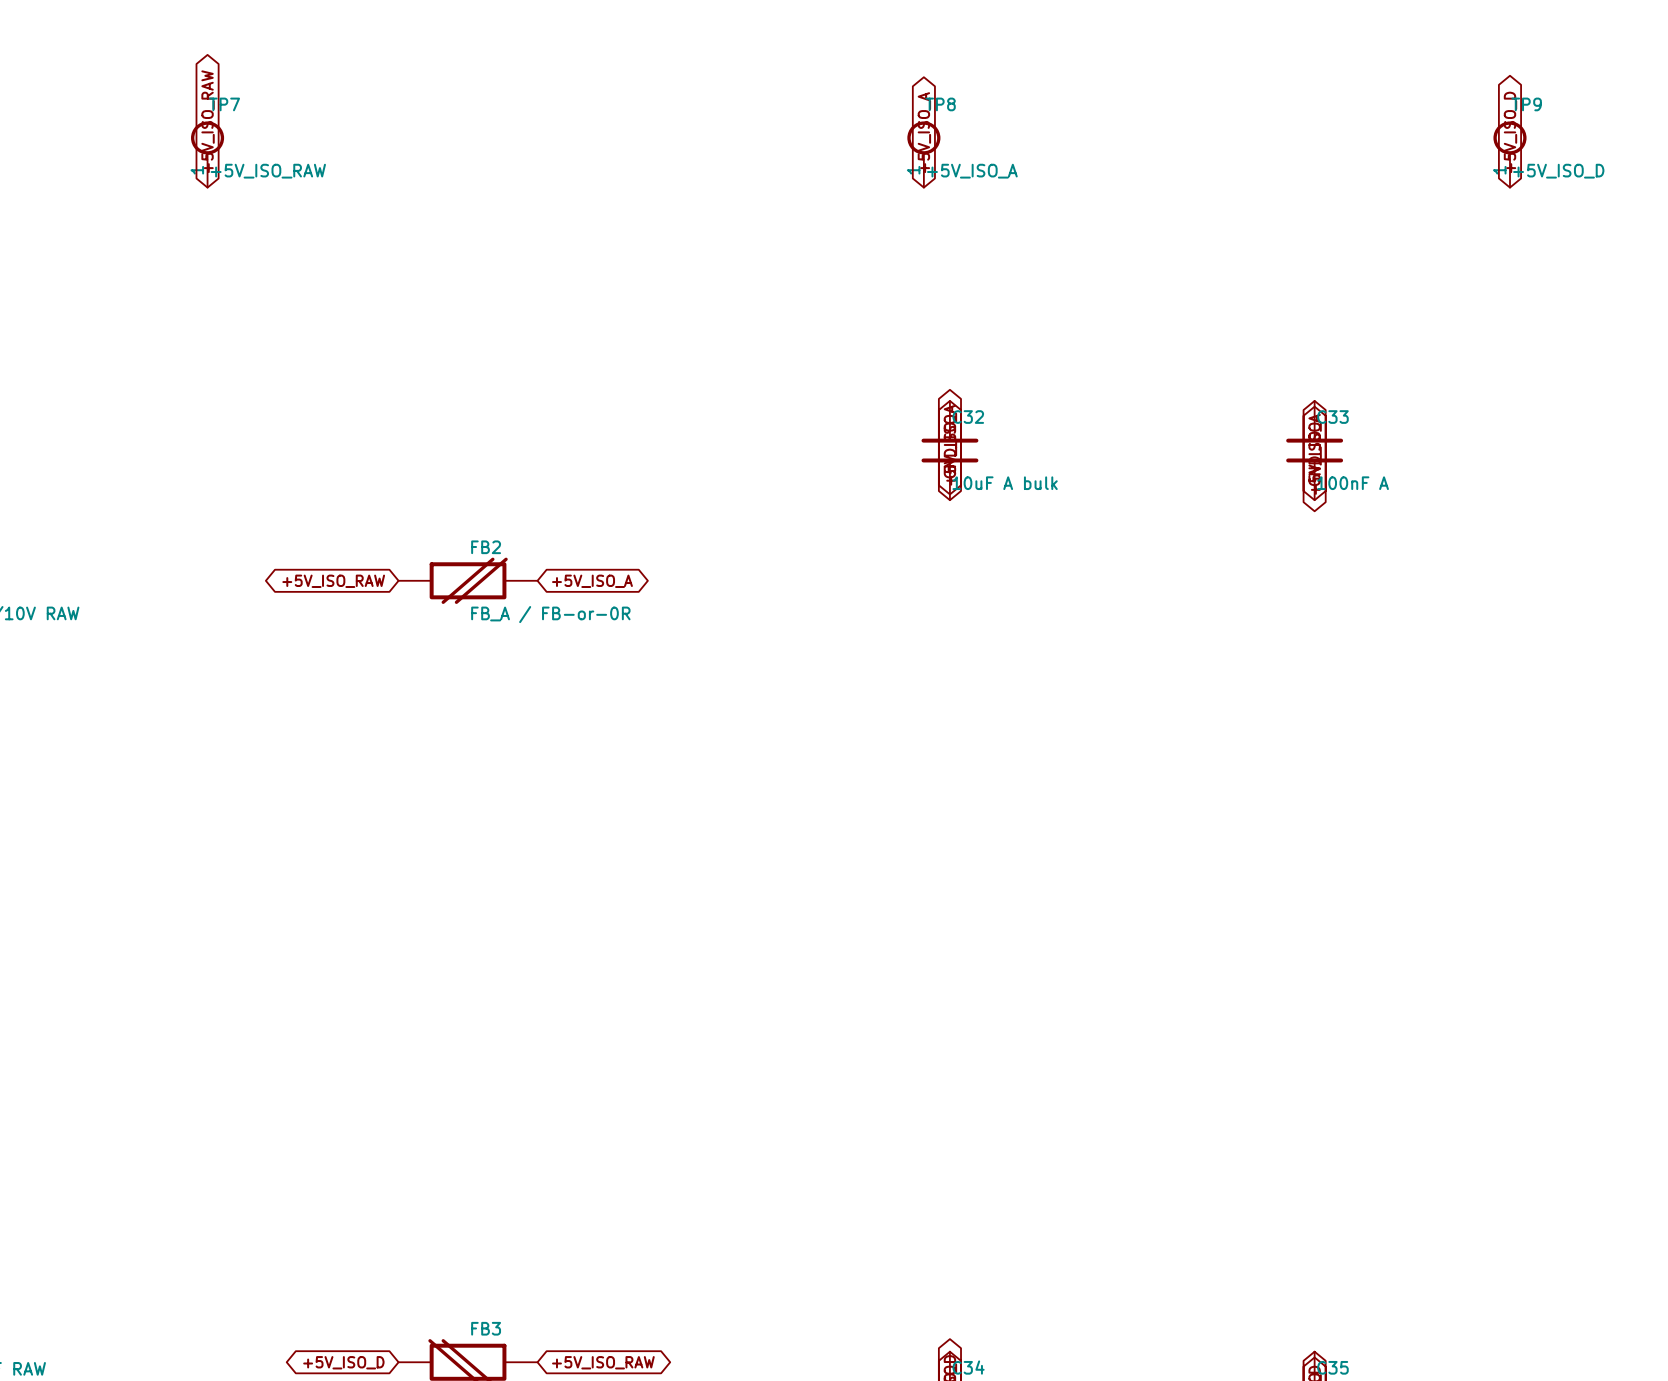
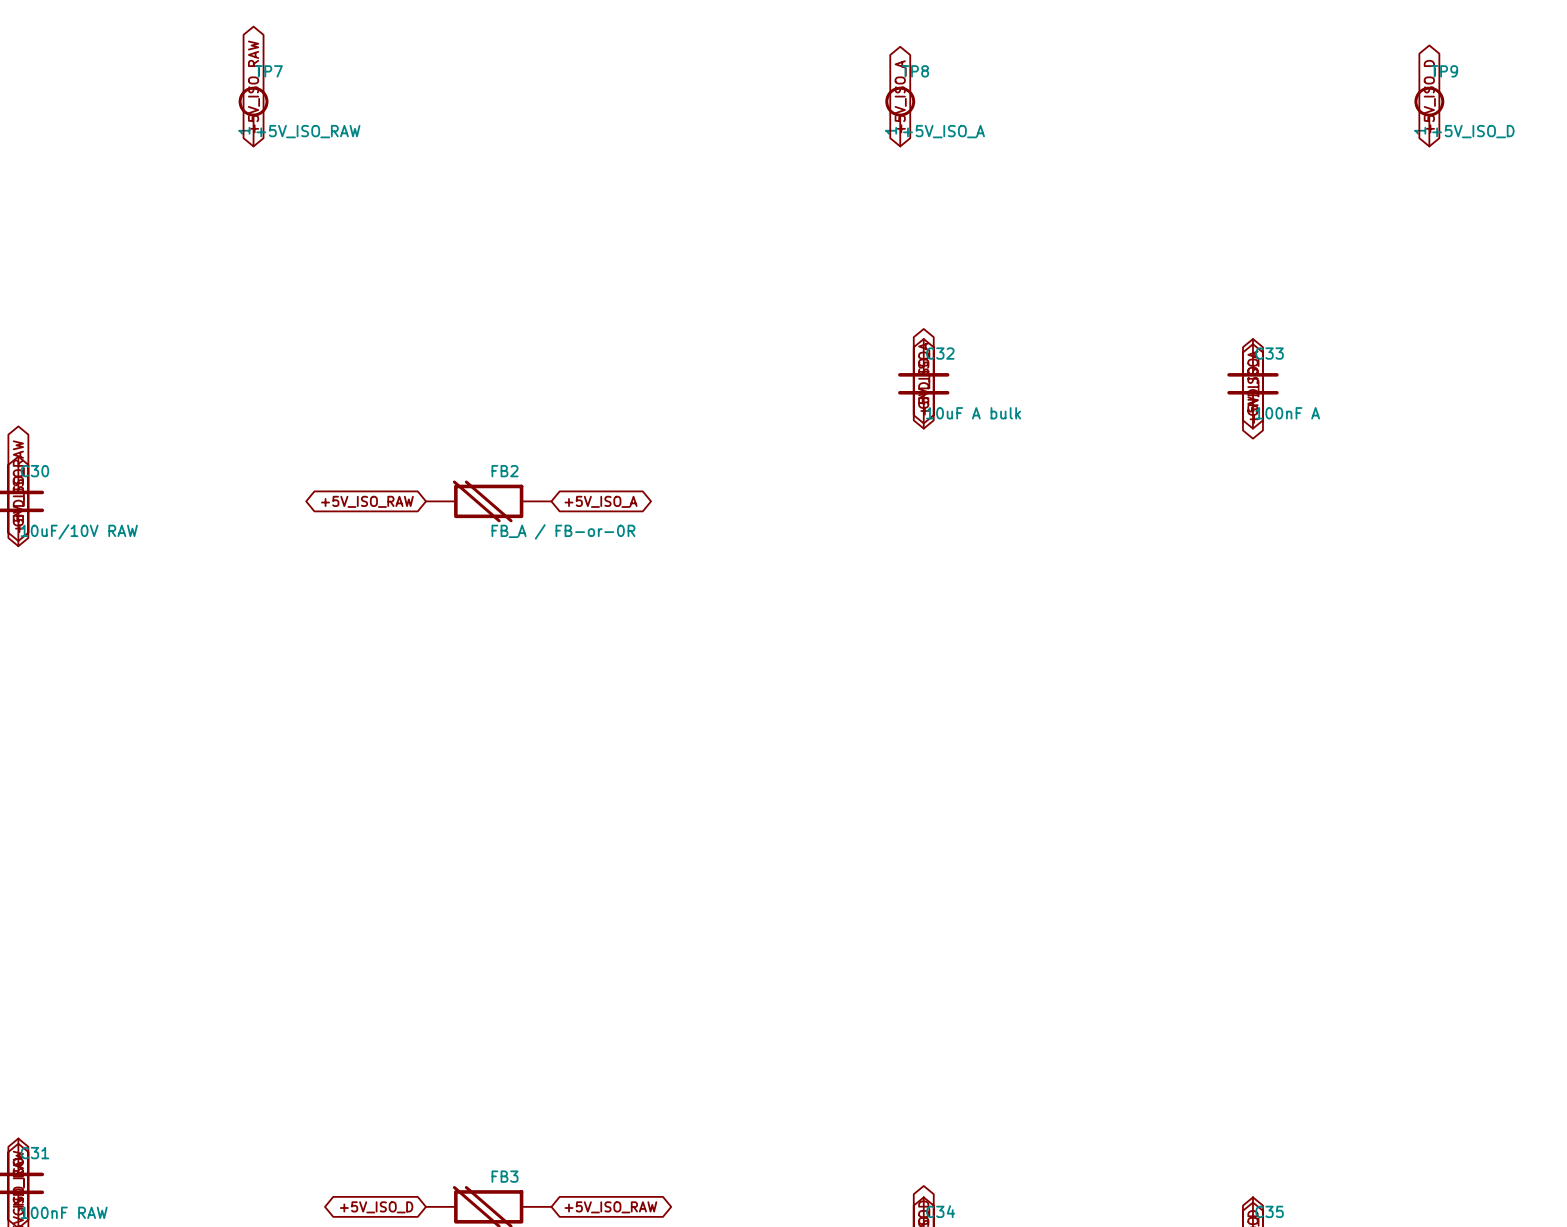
FB2 flip: as is (468, 580) -> left-right (488, 501)

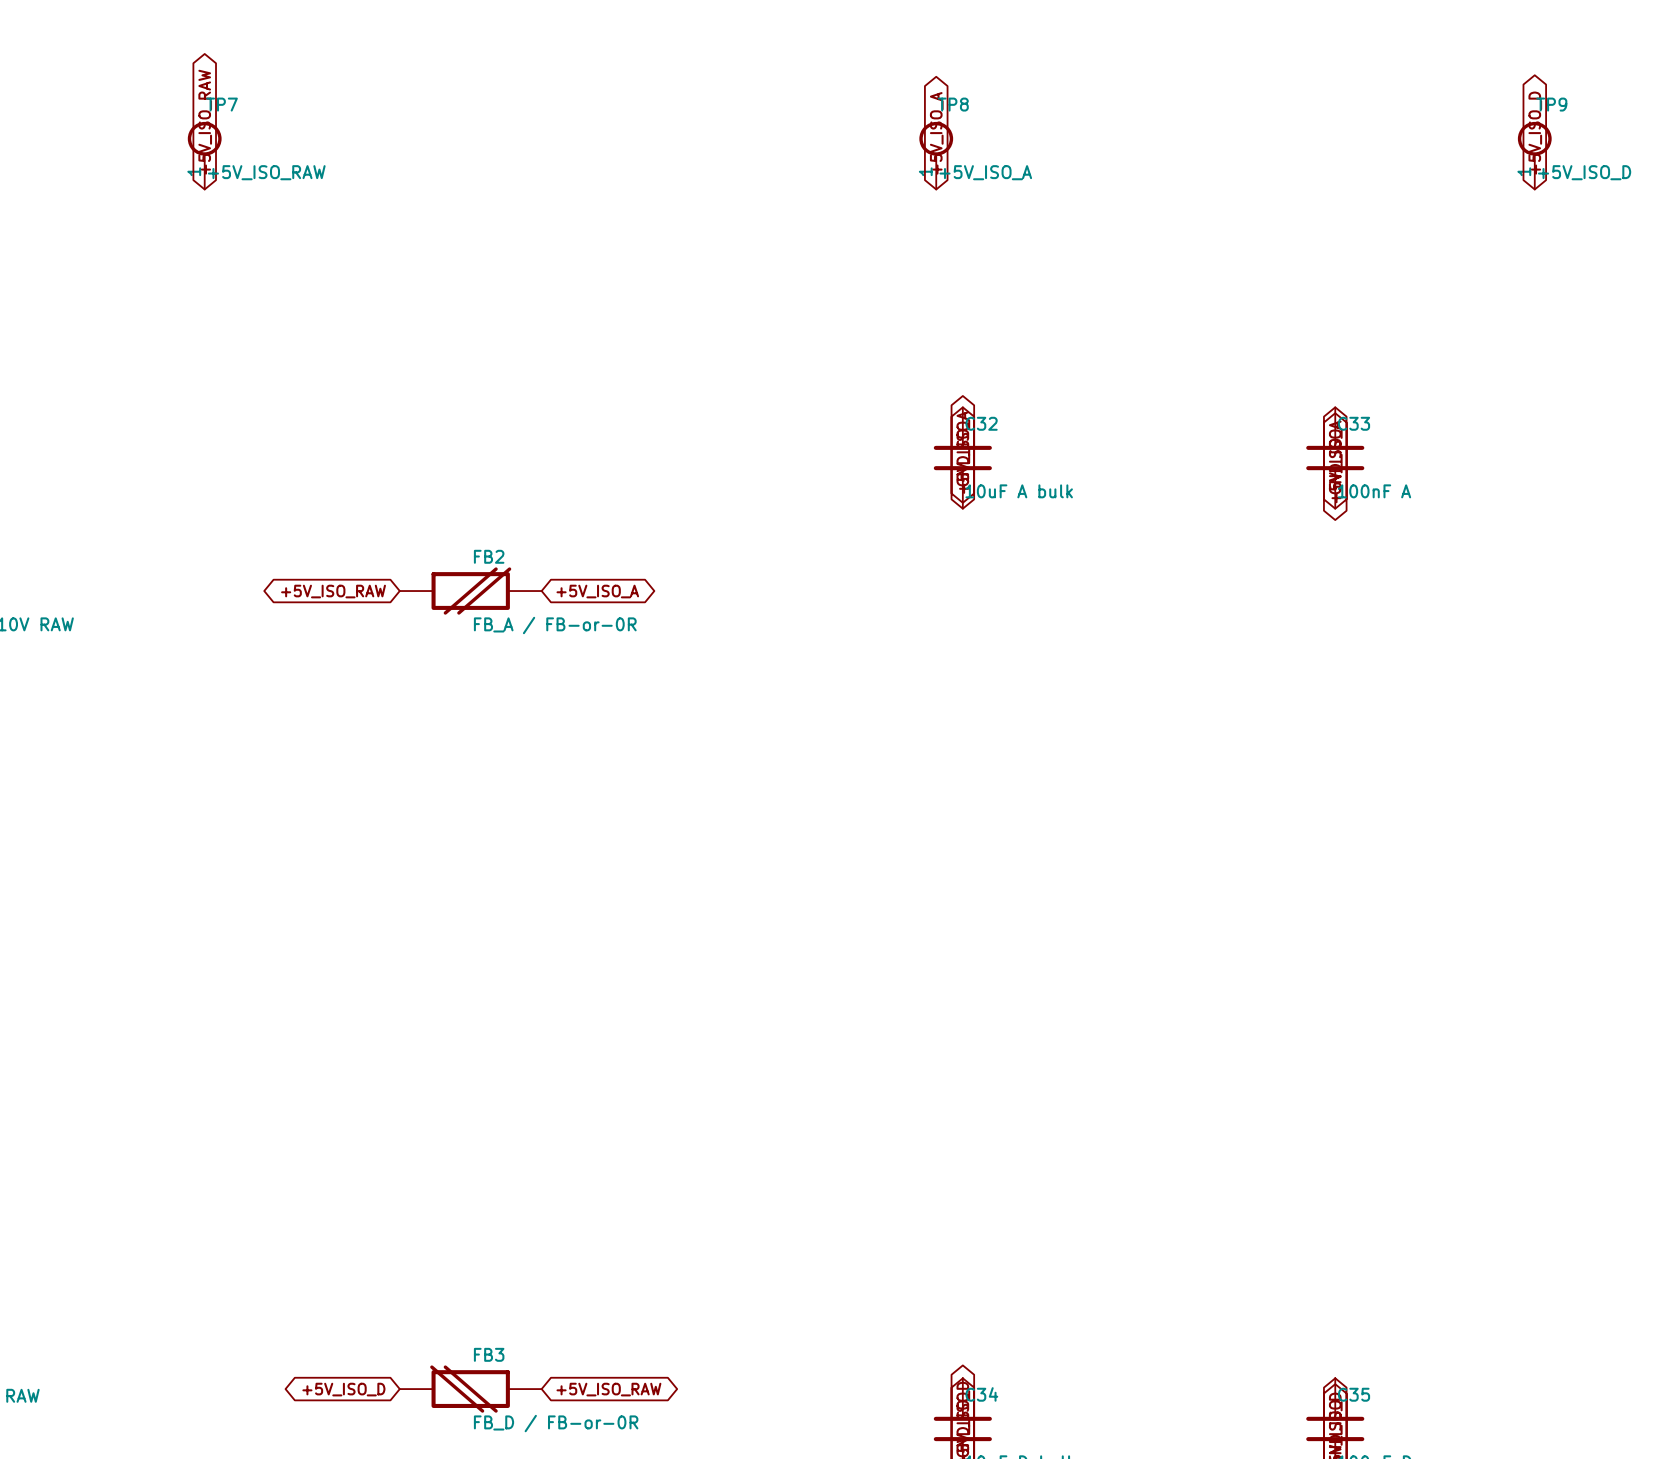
FB2 flip: as is (488, 501) -> left-right (471, 591)

